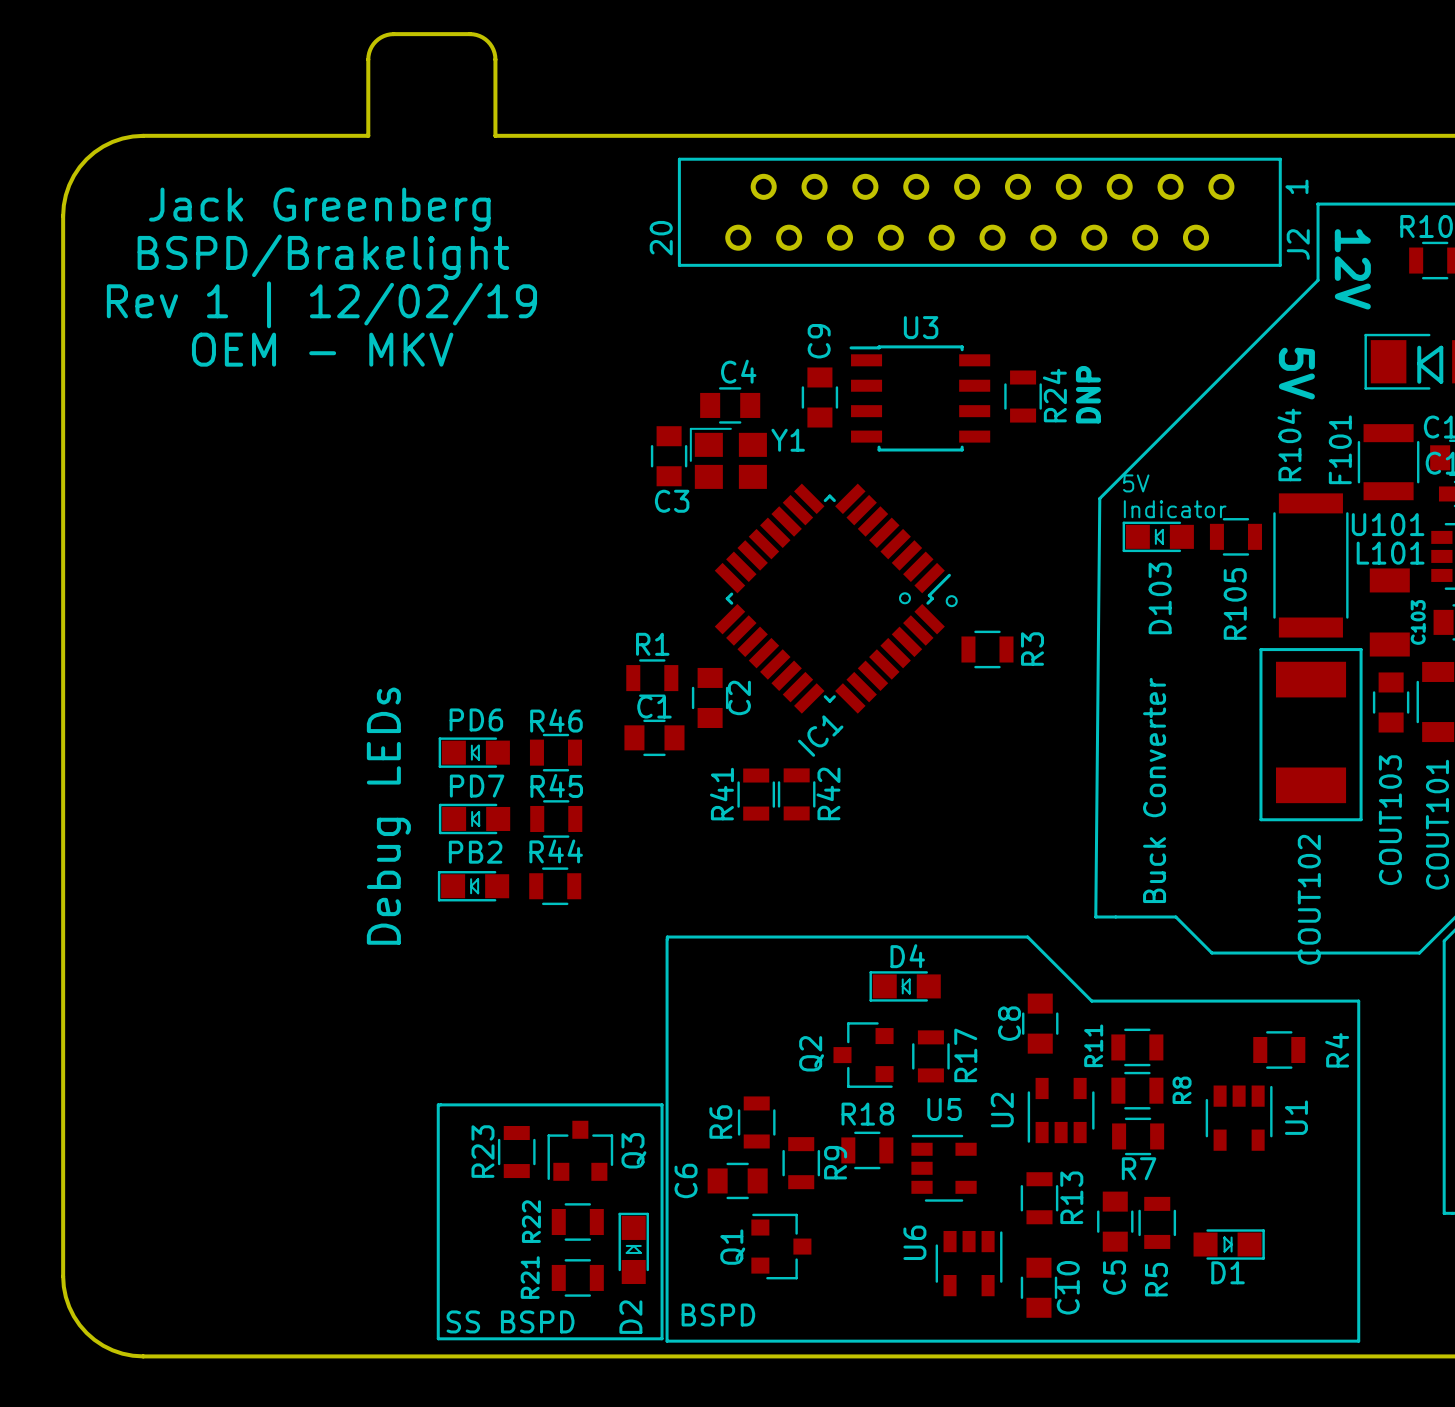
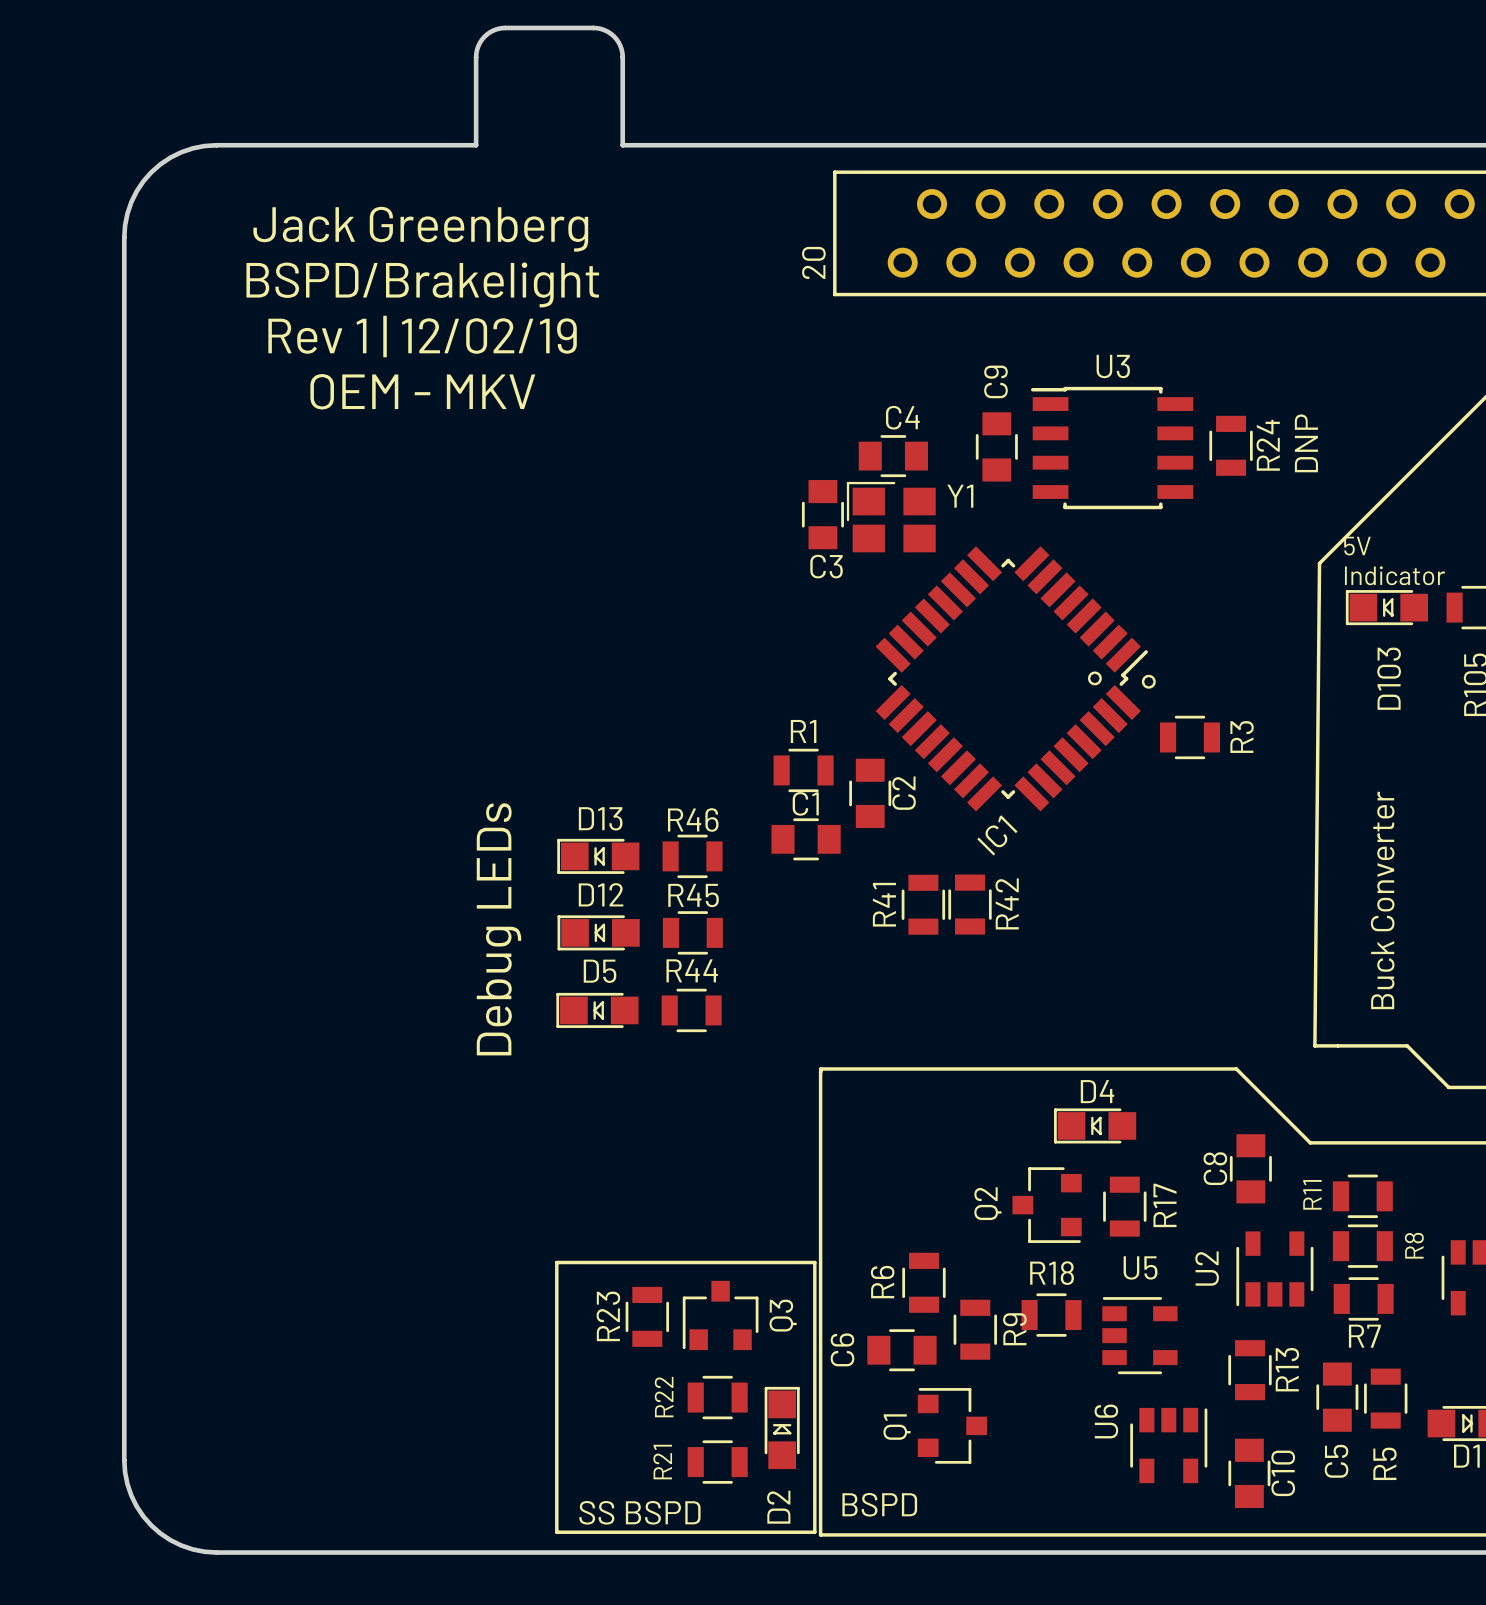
PD6 name: PD6 (476, 719) -> D13 (600, 818)
PD7 name: PD7 (477, 786) -> D12 (601, 894)
PB2 name: PB2 (475, 852) -> D5 (600, 971)

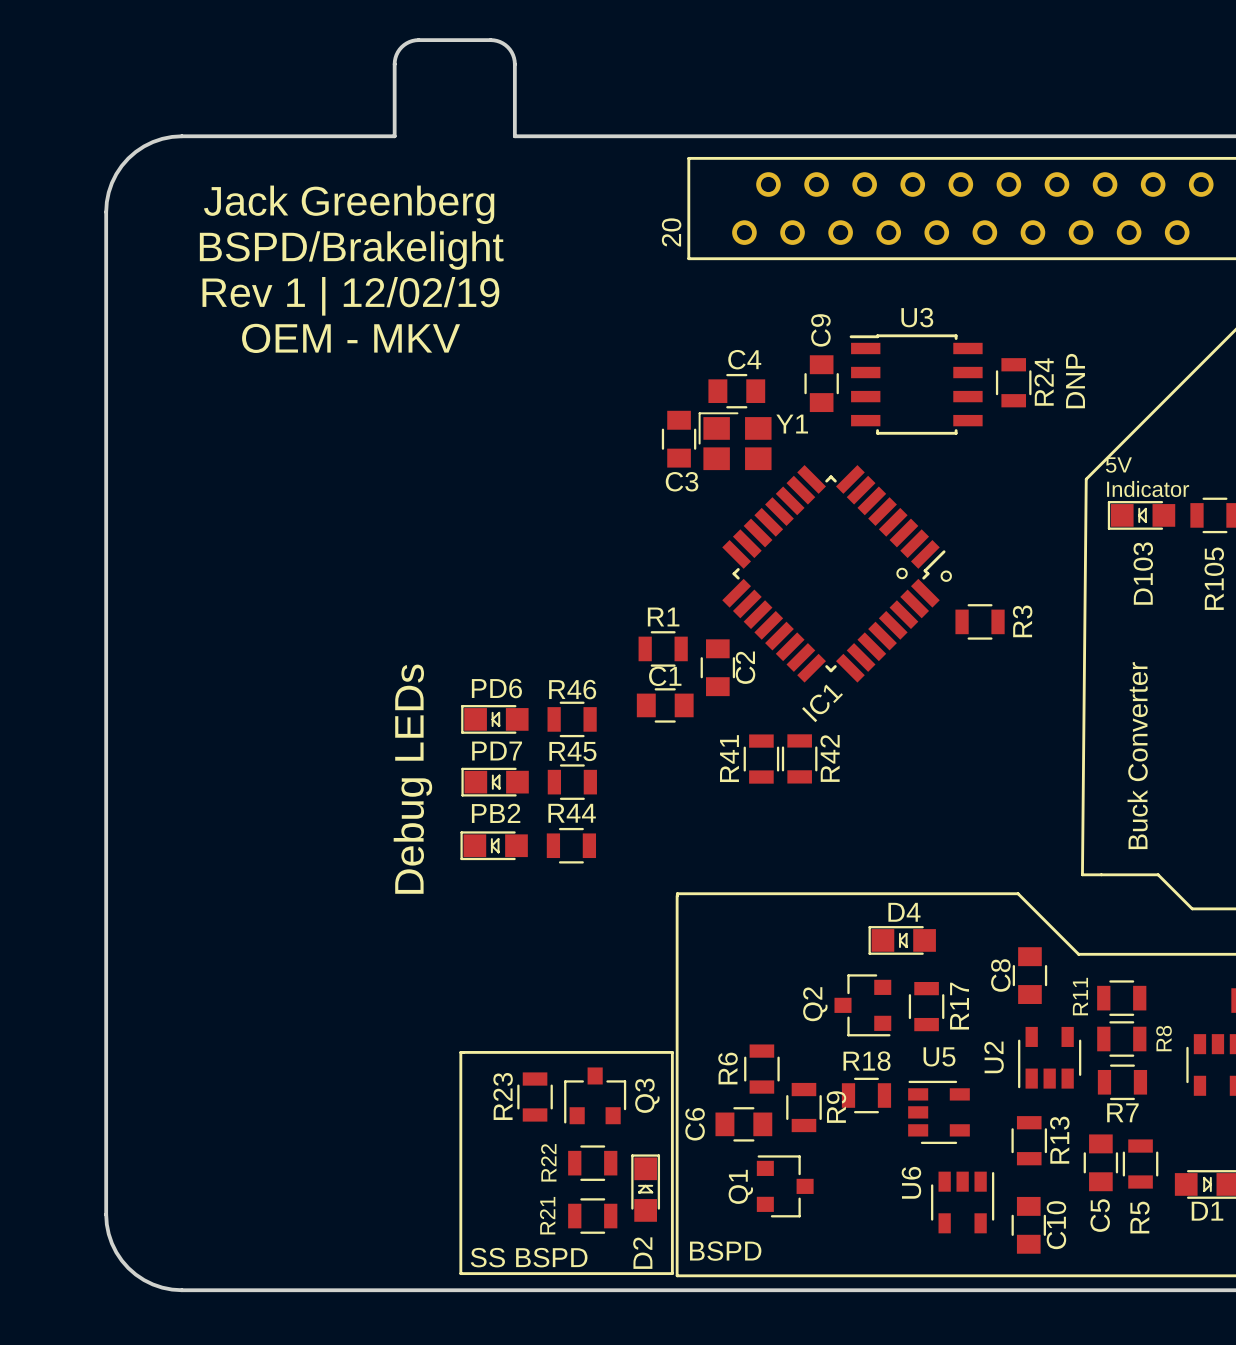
D13 name: D13 (600, 818) -> PD6 (496, 688)
D12 name: D12 (601, 894) -> PD7 (497, 751)
D5 name: D5 (600, 971) -> PB2 (496, 813)

